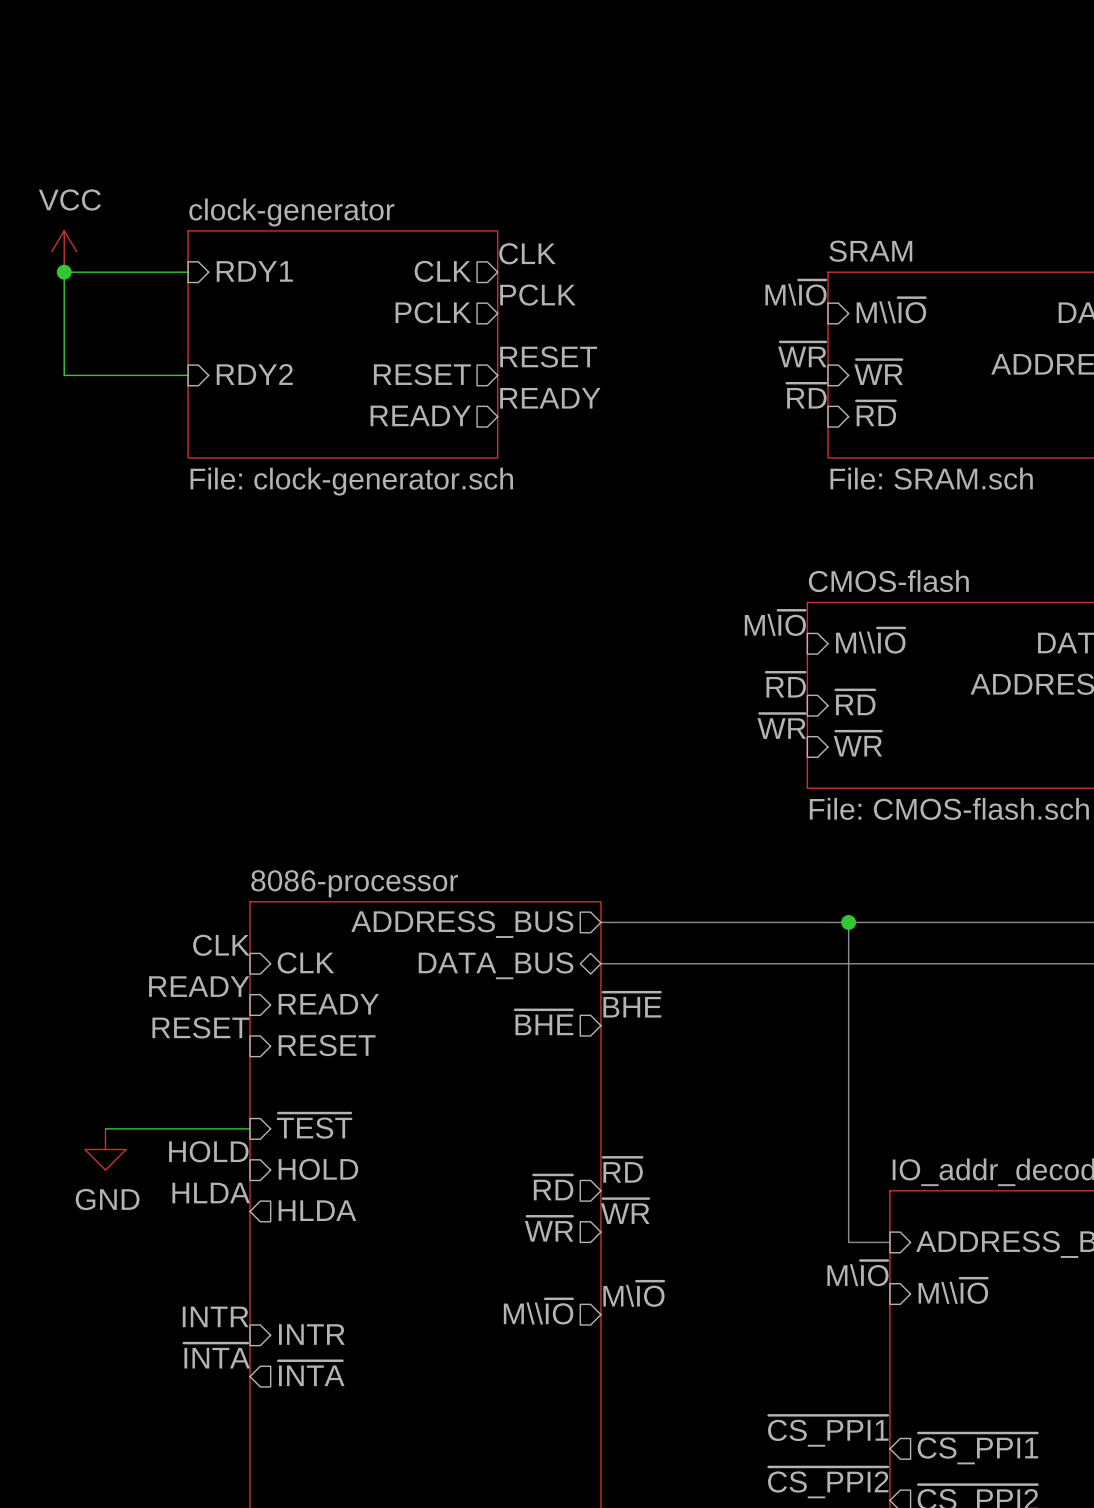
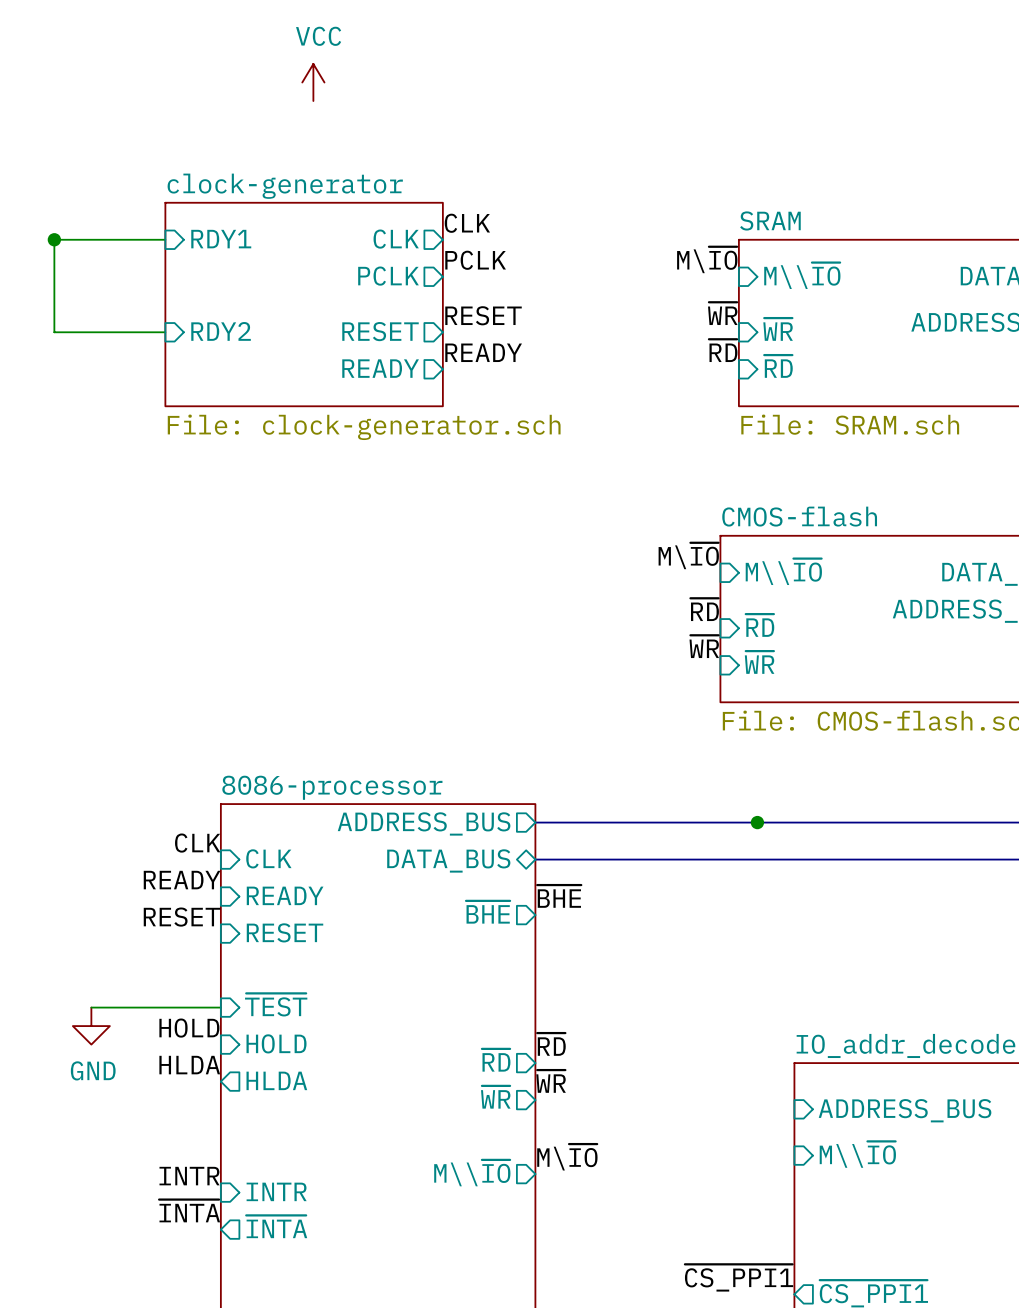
power symbol position: VCC (64, 251) -> VCC (313, 82)
bus: (848, 922) (848, 1242) (889, 1242) -> none
label: M\~{IO} (857, 1273) -> none

